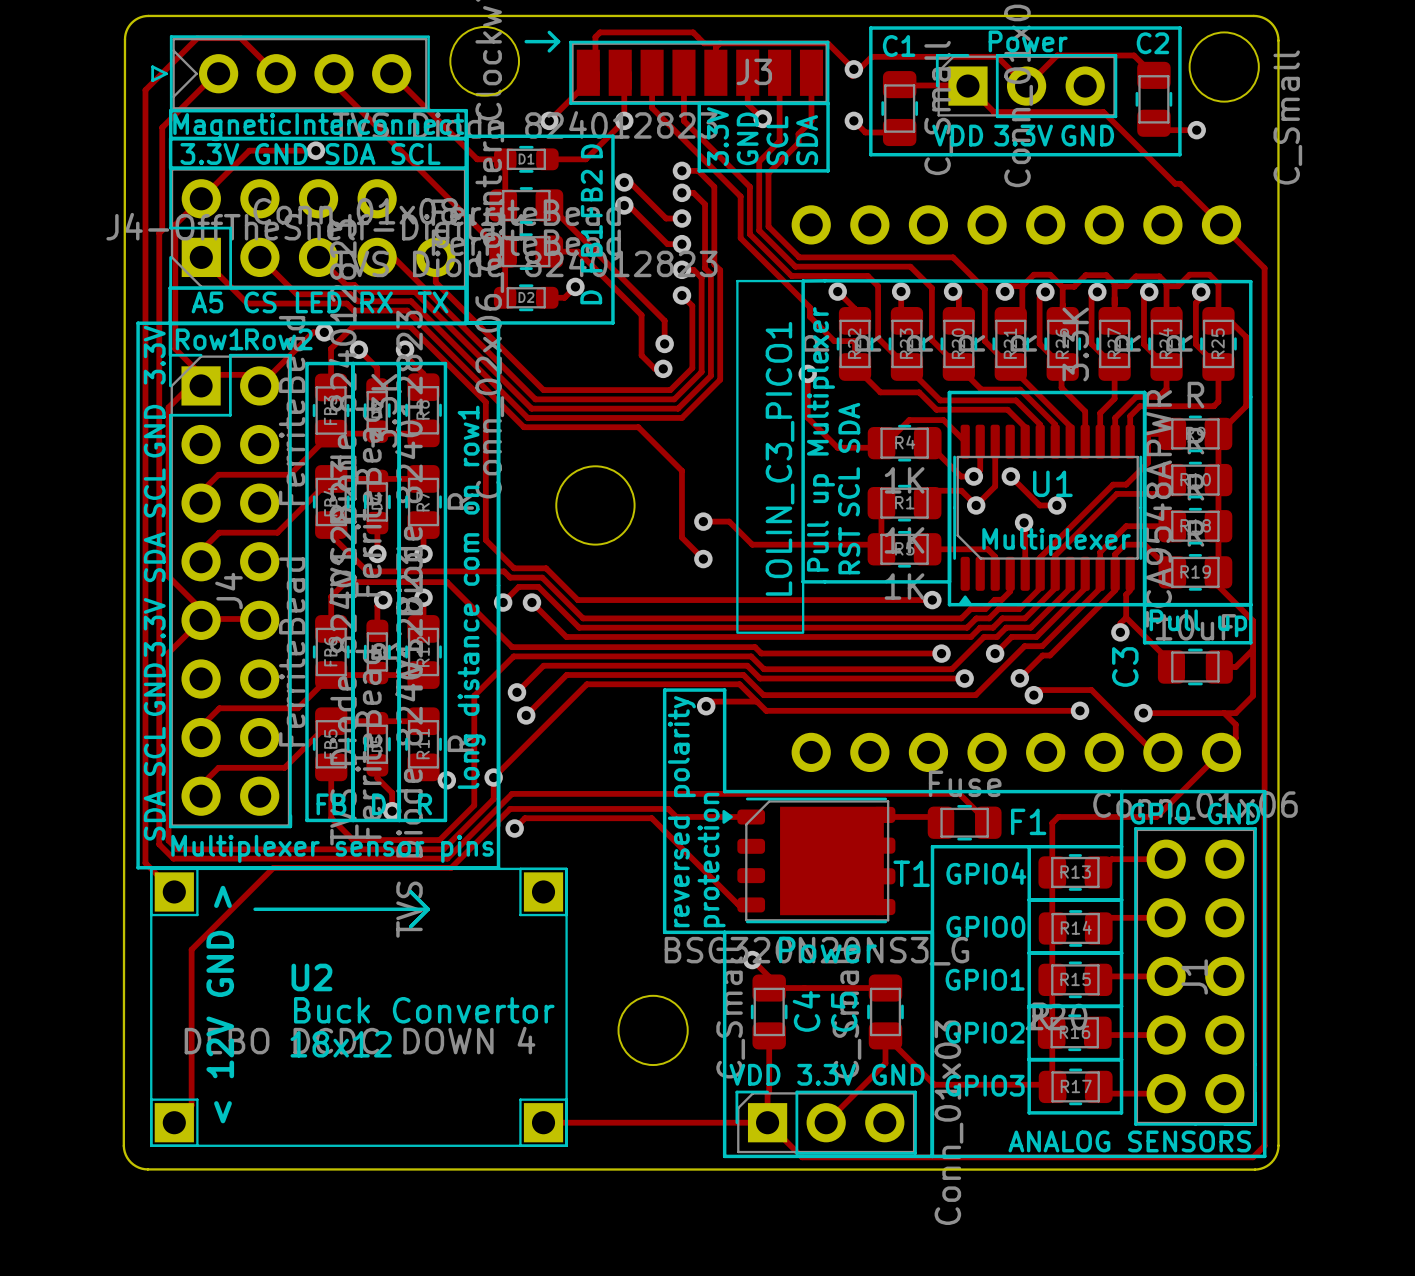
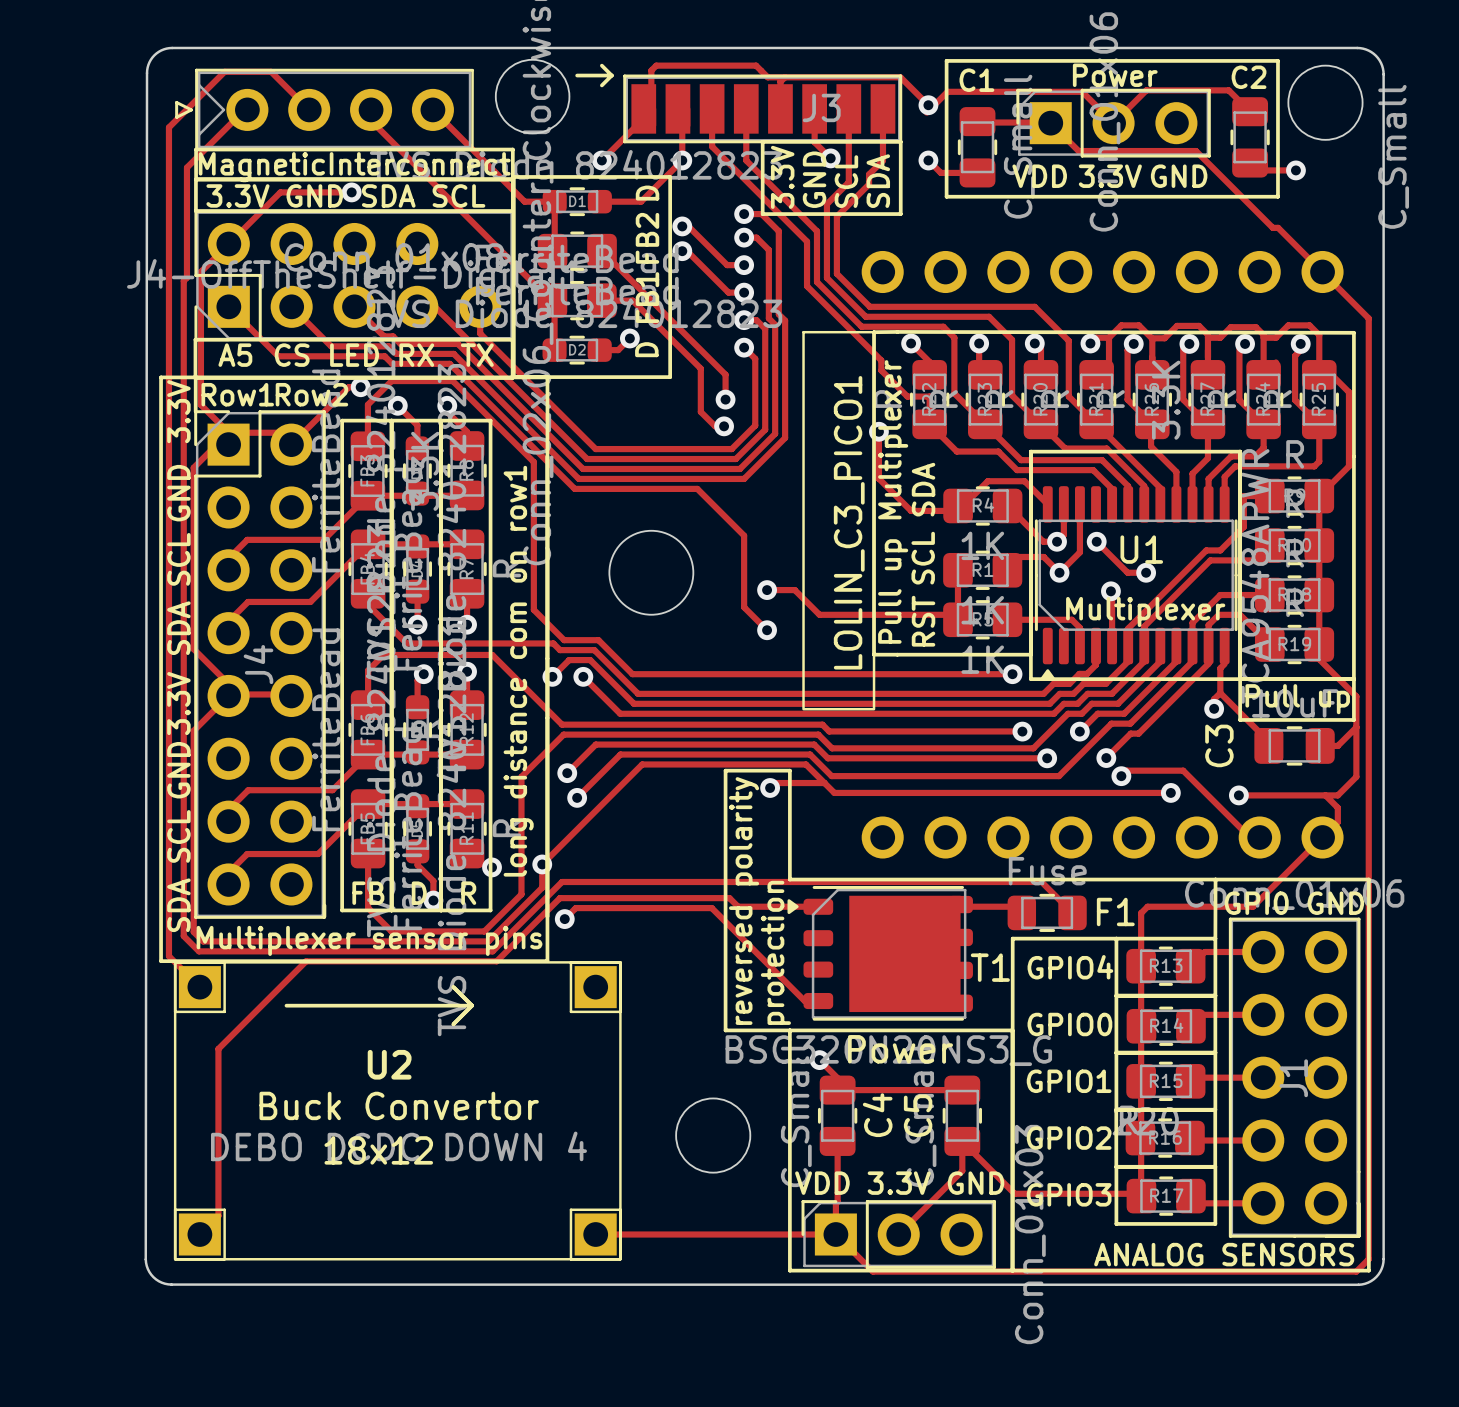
U2 name position: U2 (311, 977) -> U2 (389, 1064)
text: < 12V GND > (220, 1004) -> none
text position: Buck Convertor (424, 1010) -> Buck Convertor (399, 1105)

